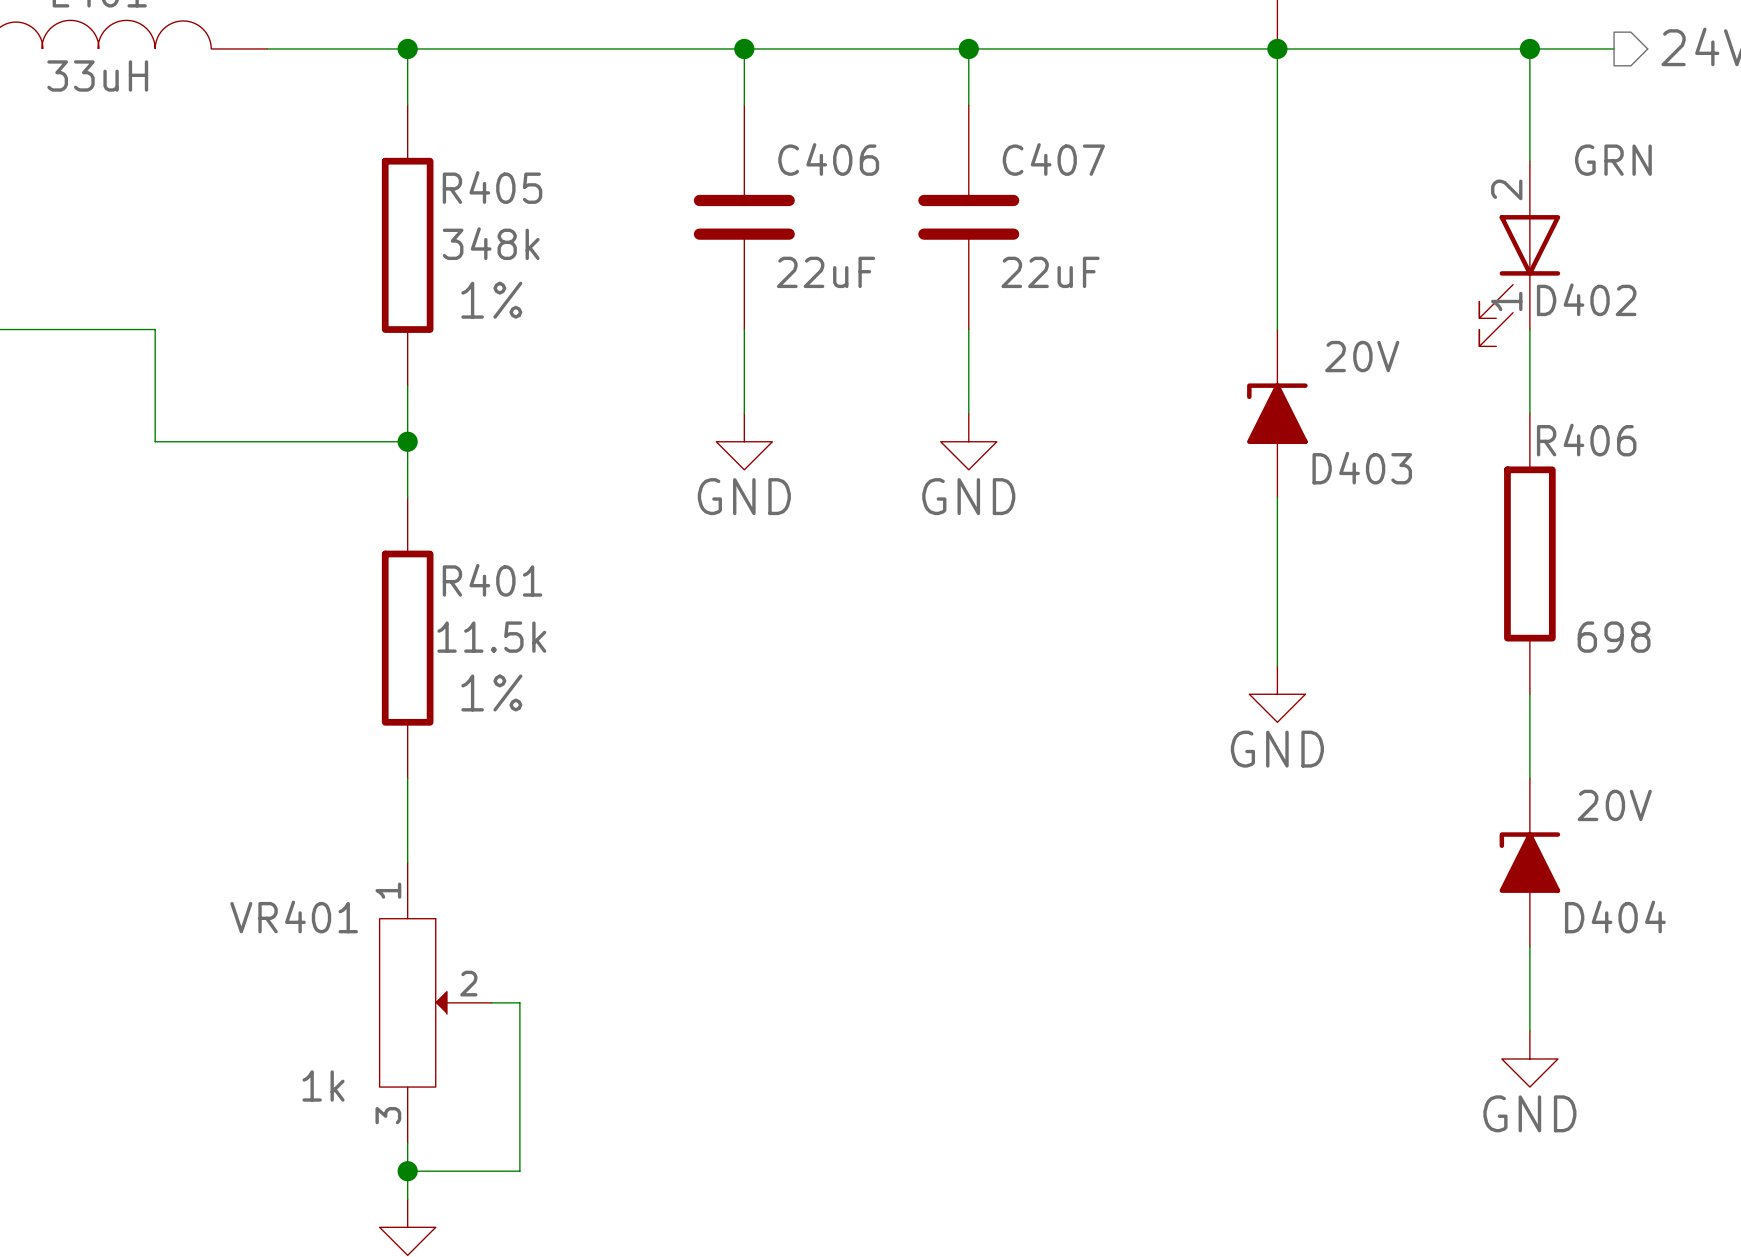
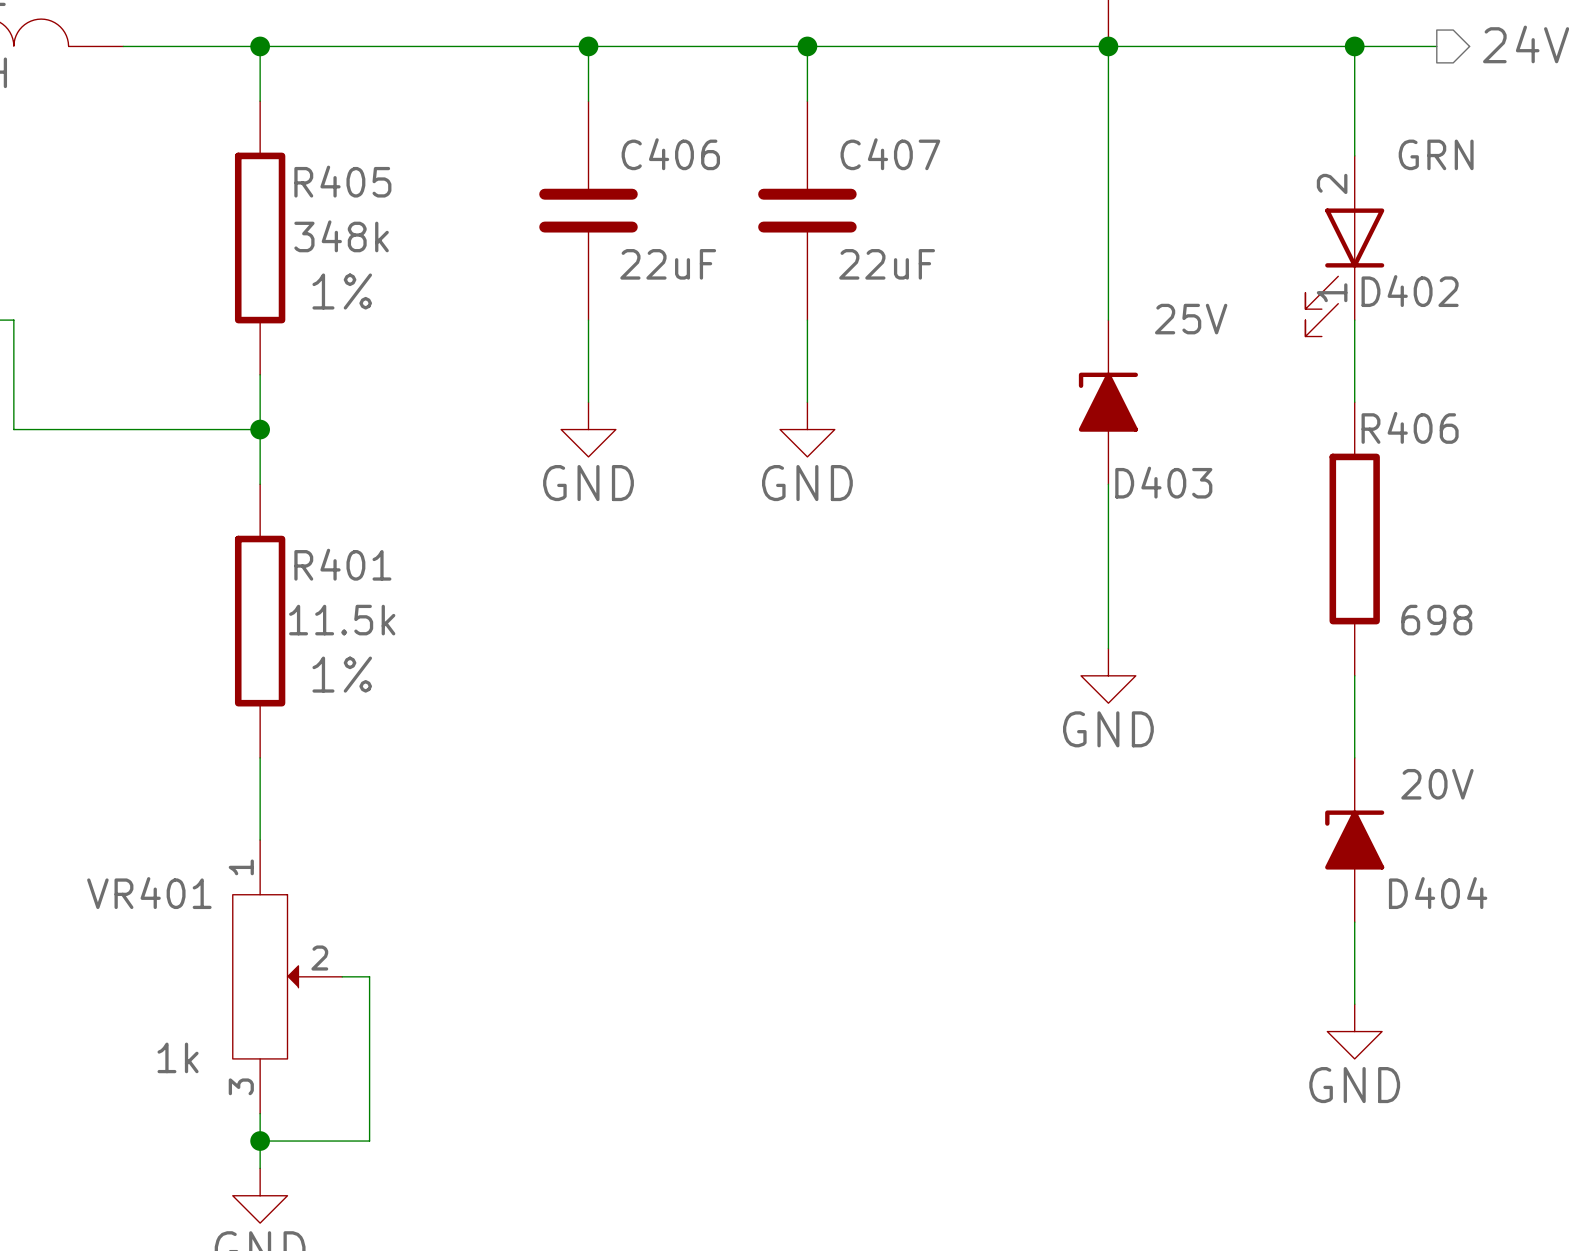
D403 value: 20V (1362, 356) -> 25V (1191, 319)
D403 name position: D403 (1362, 468) -> D403 (1163, 482)

